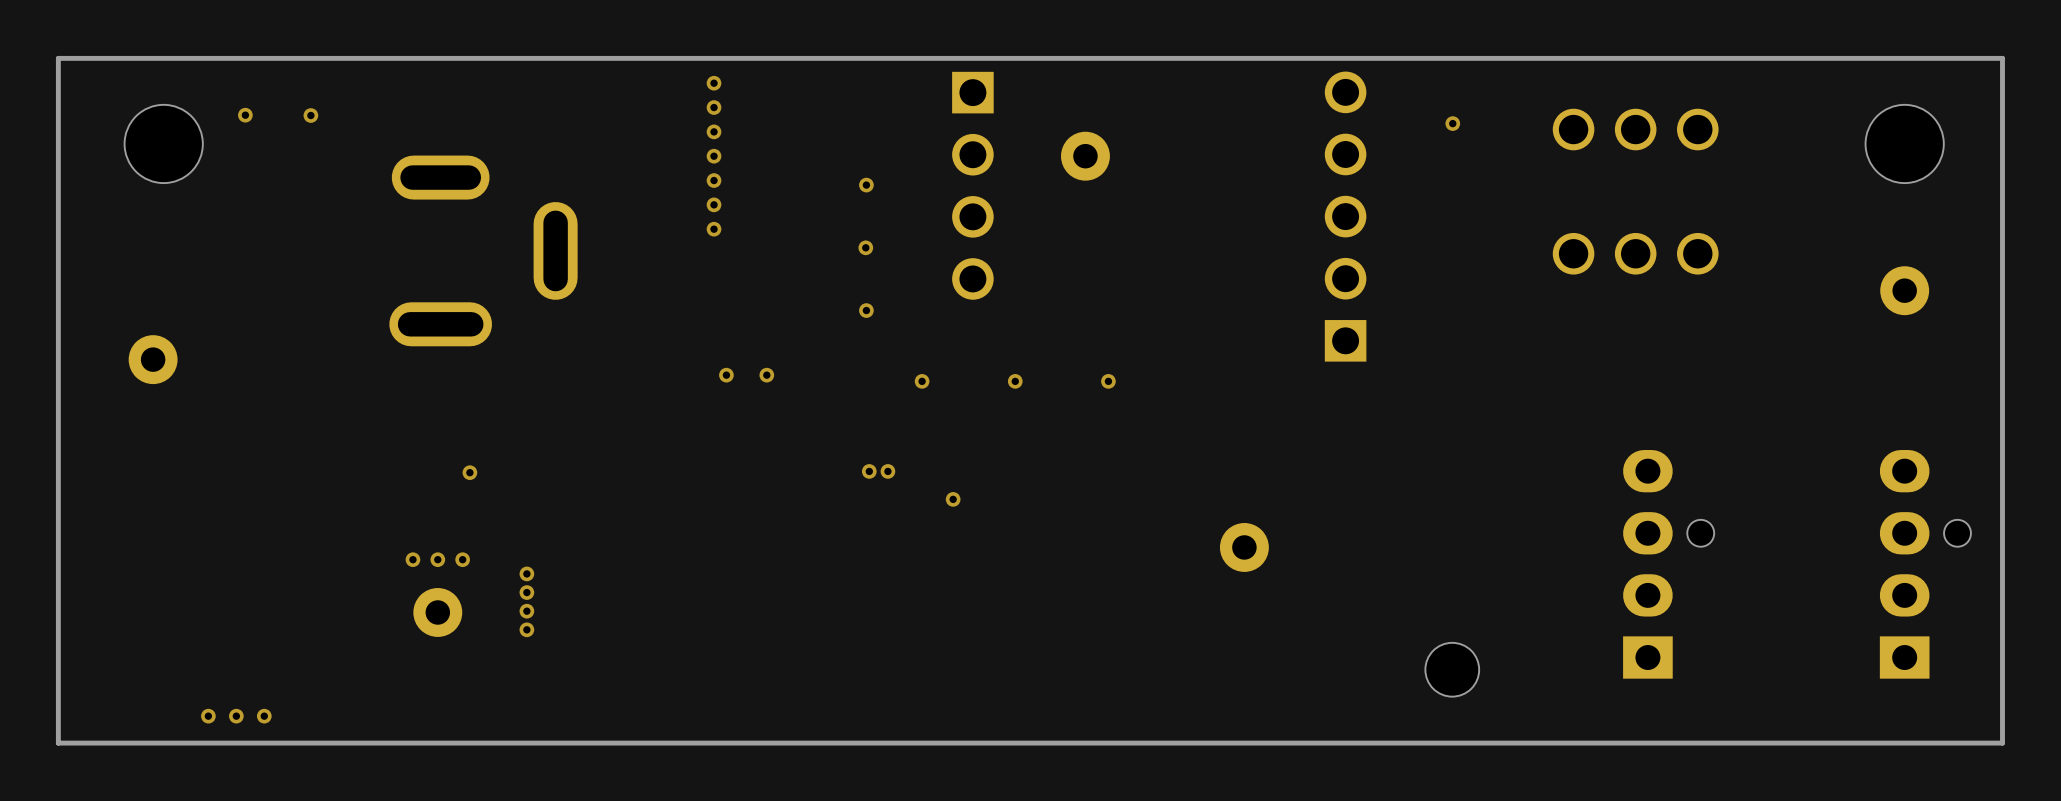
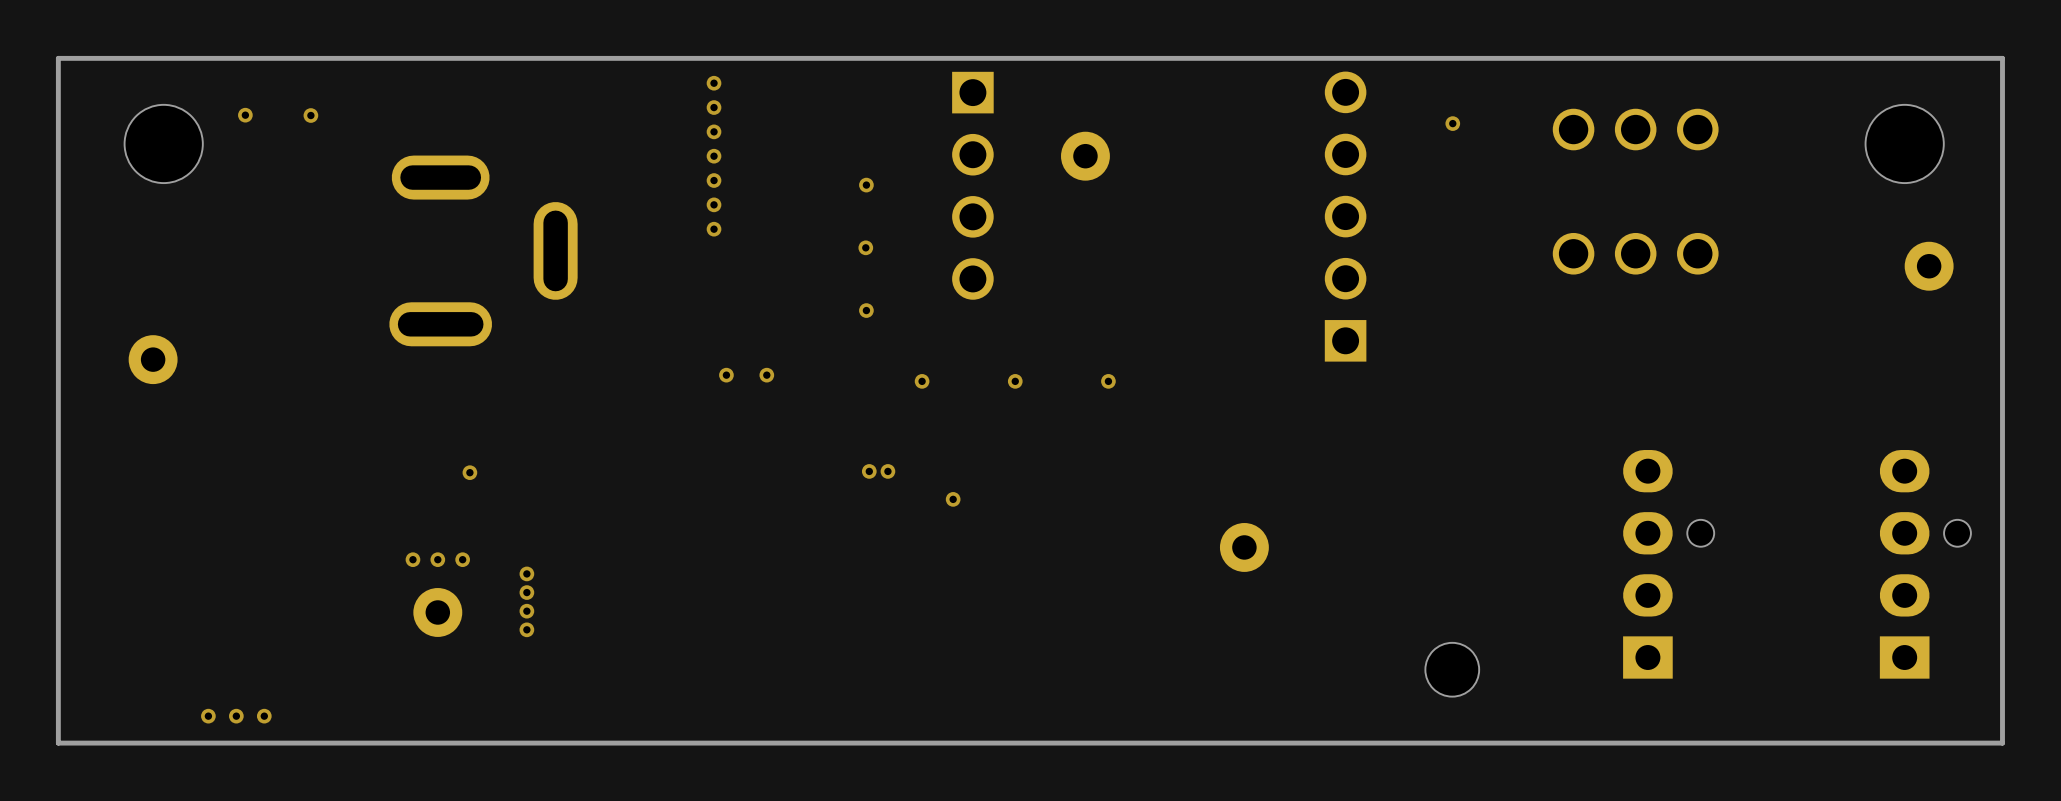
part position: (1904, 290) -> (1929, 266)

